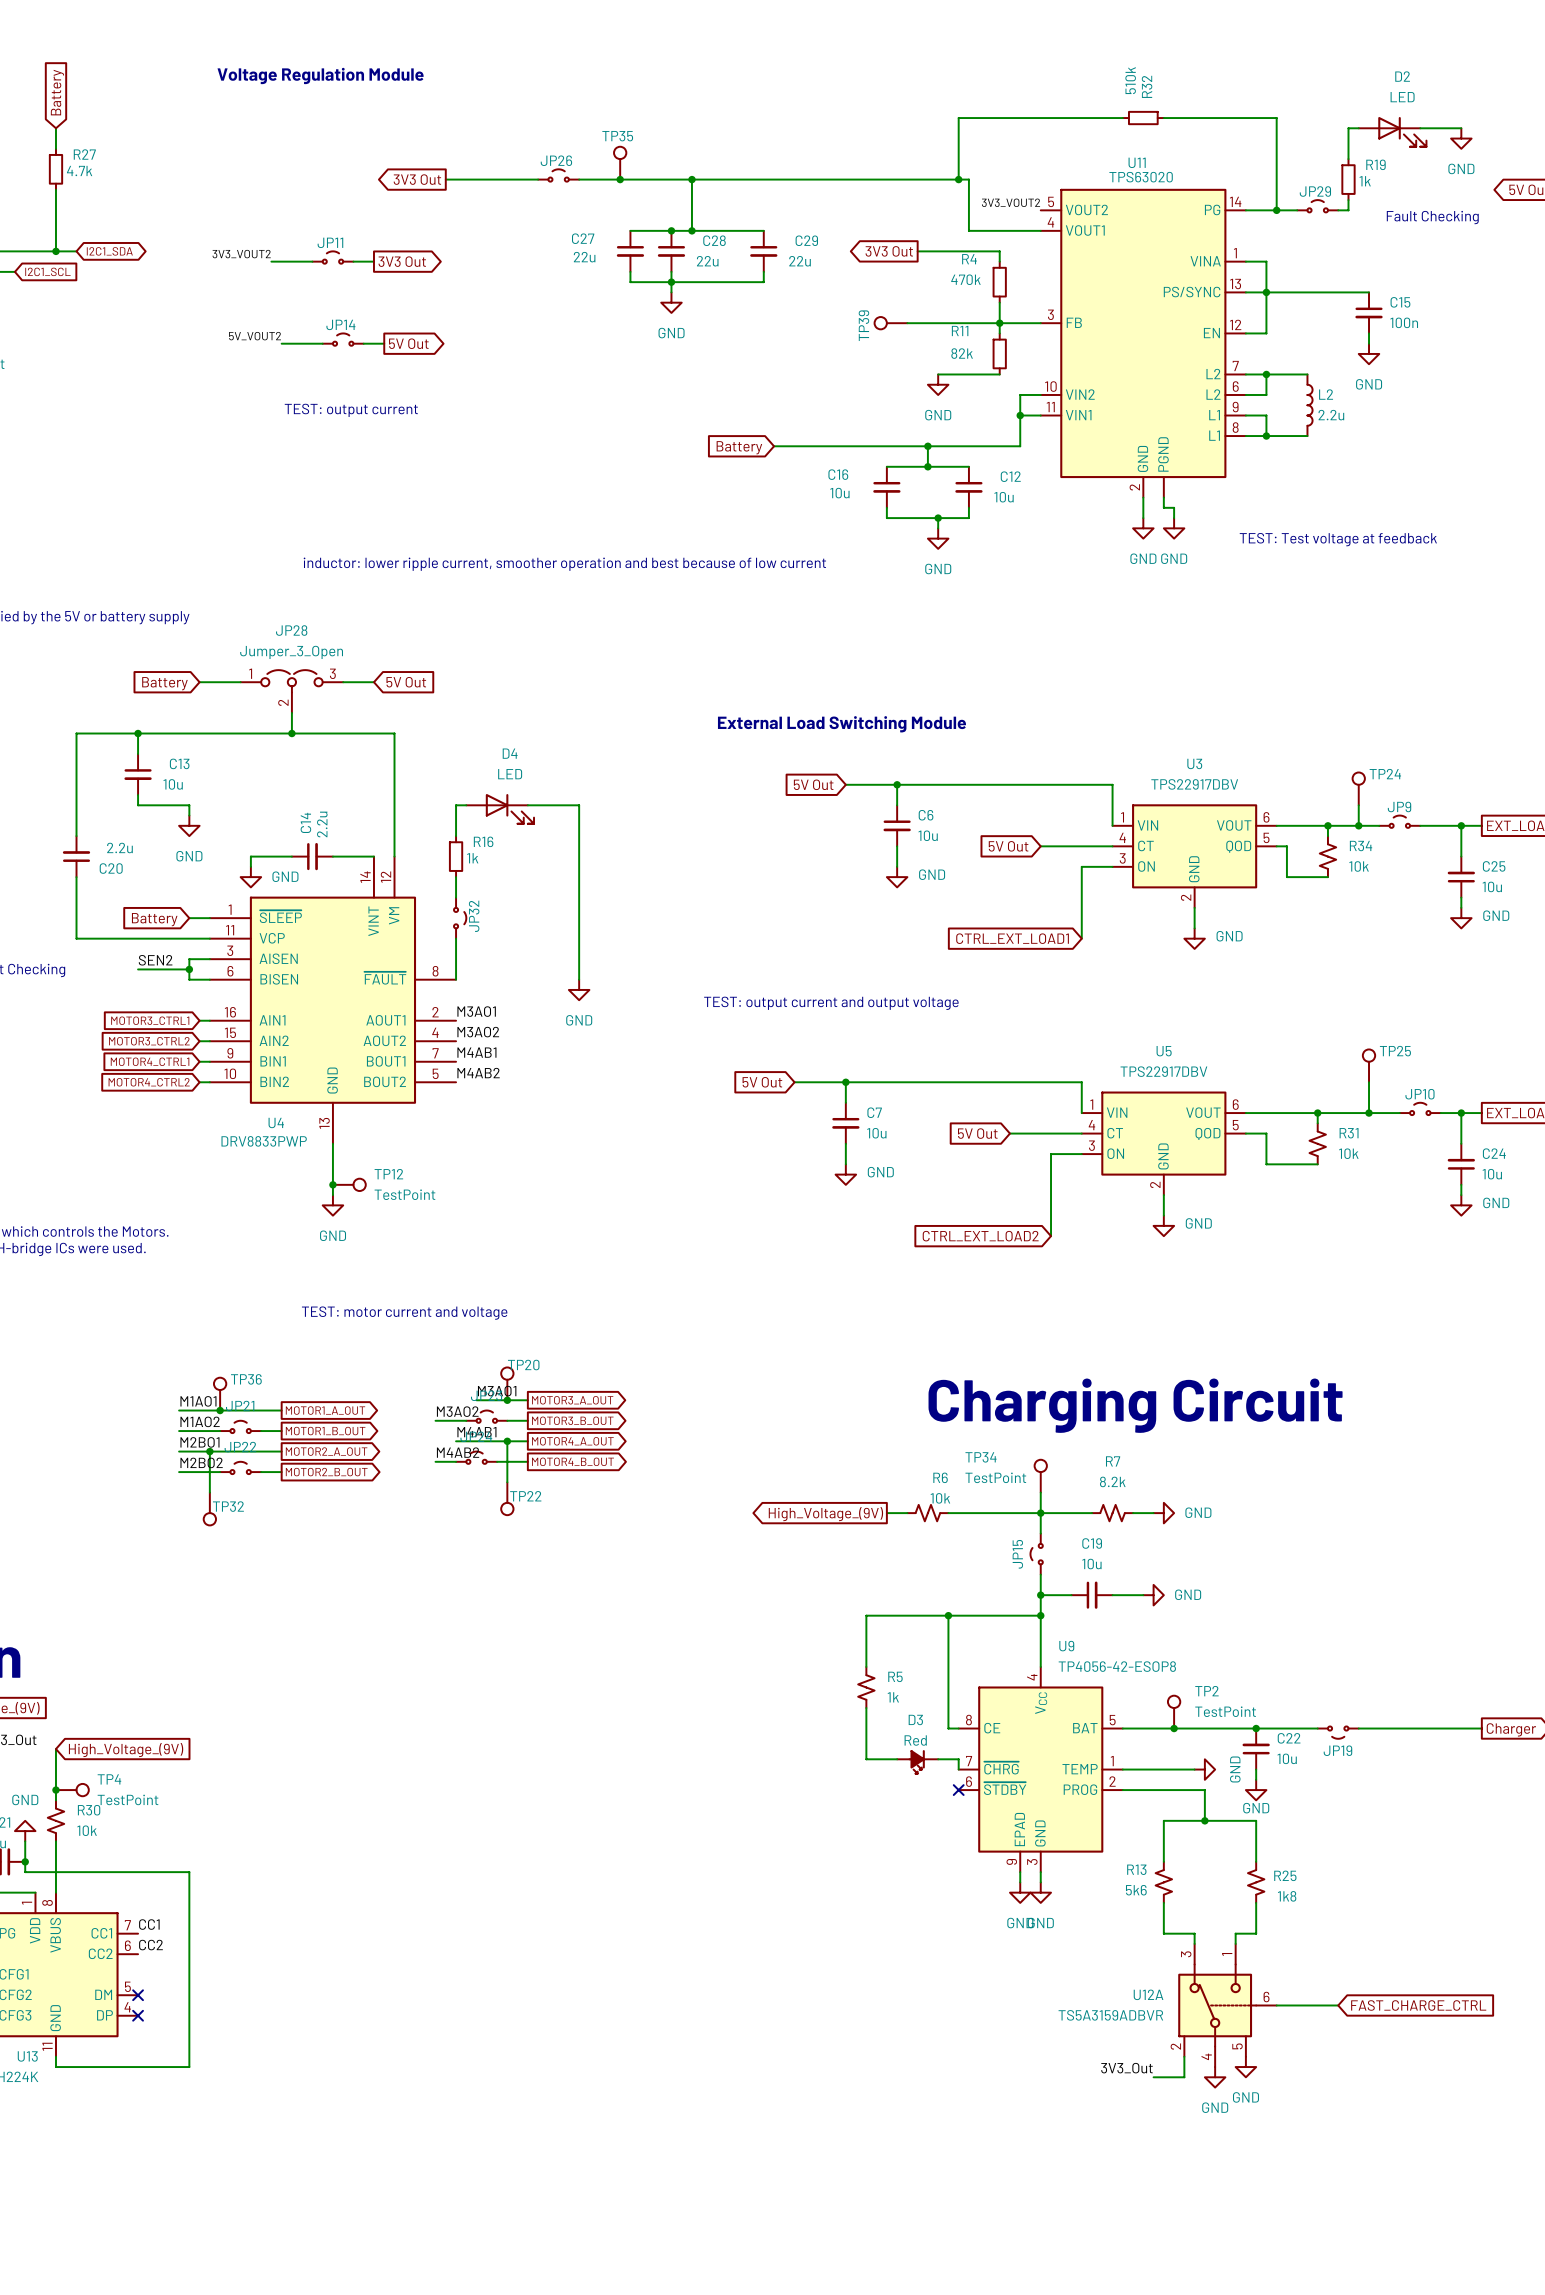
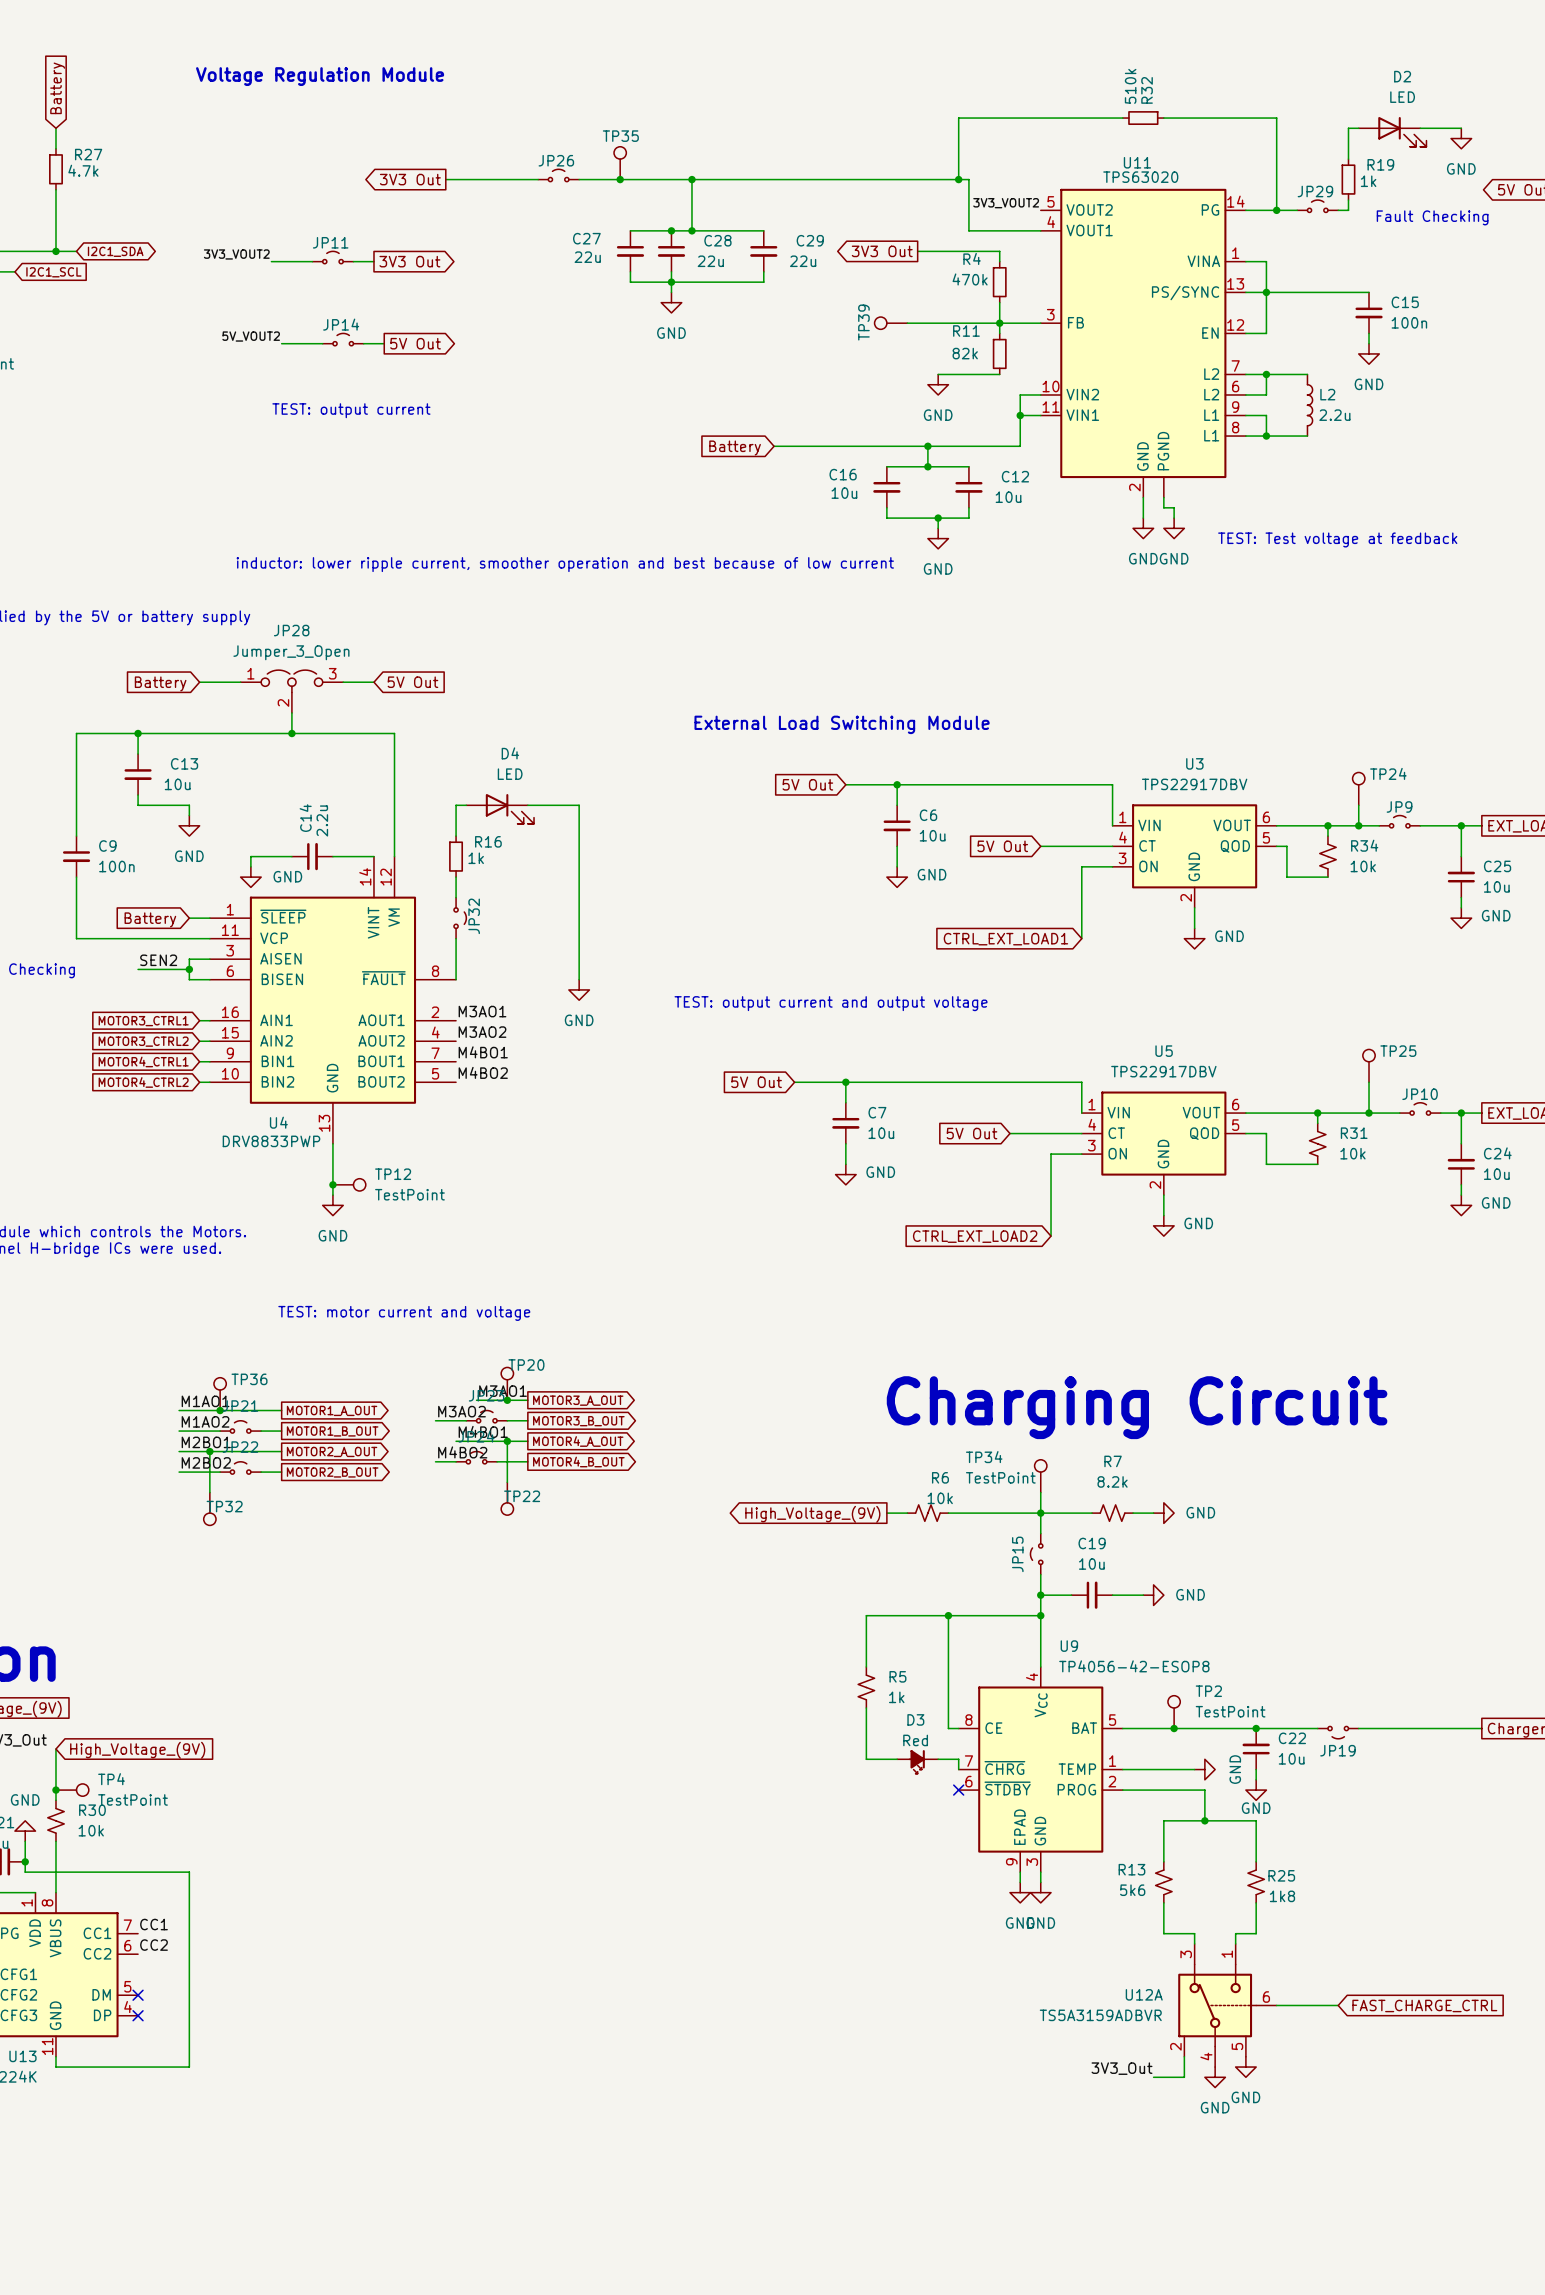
C20: 2.2u (76, 856) -> none
C9: none -> 100n (76, 856)
label: M4AB1 (476, 1052) -> M4BO1 (483, 1052)
label: M4AB2 (478, 1073) -> M4BO2 (483, 1072)
label: M4AB1 (476, 1432) -> M4BO1 (483, 1431)
label: M4AB2 (458, 1452) -> M4BO2 (462, 1452)

